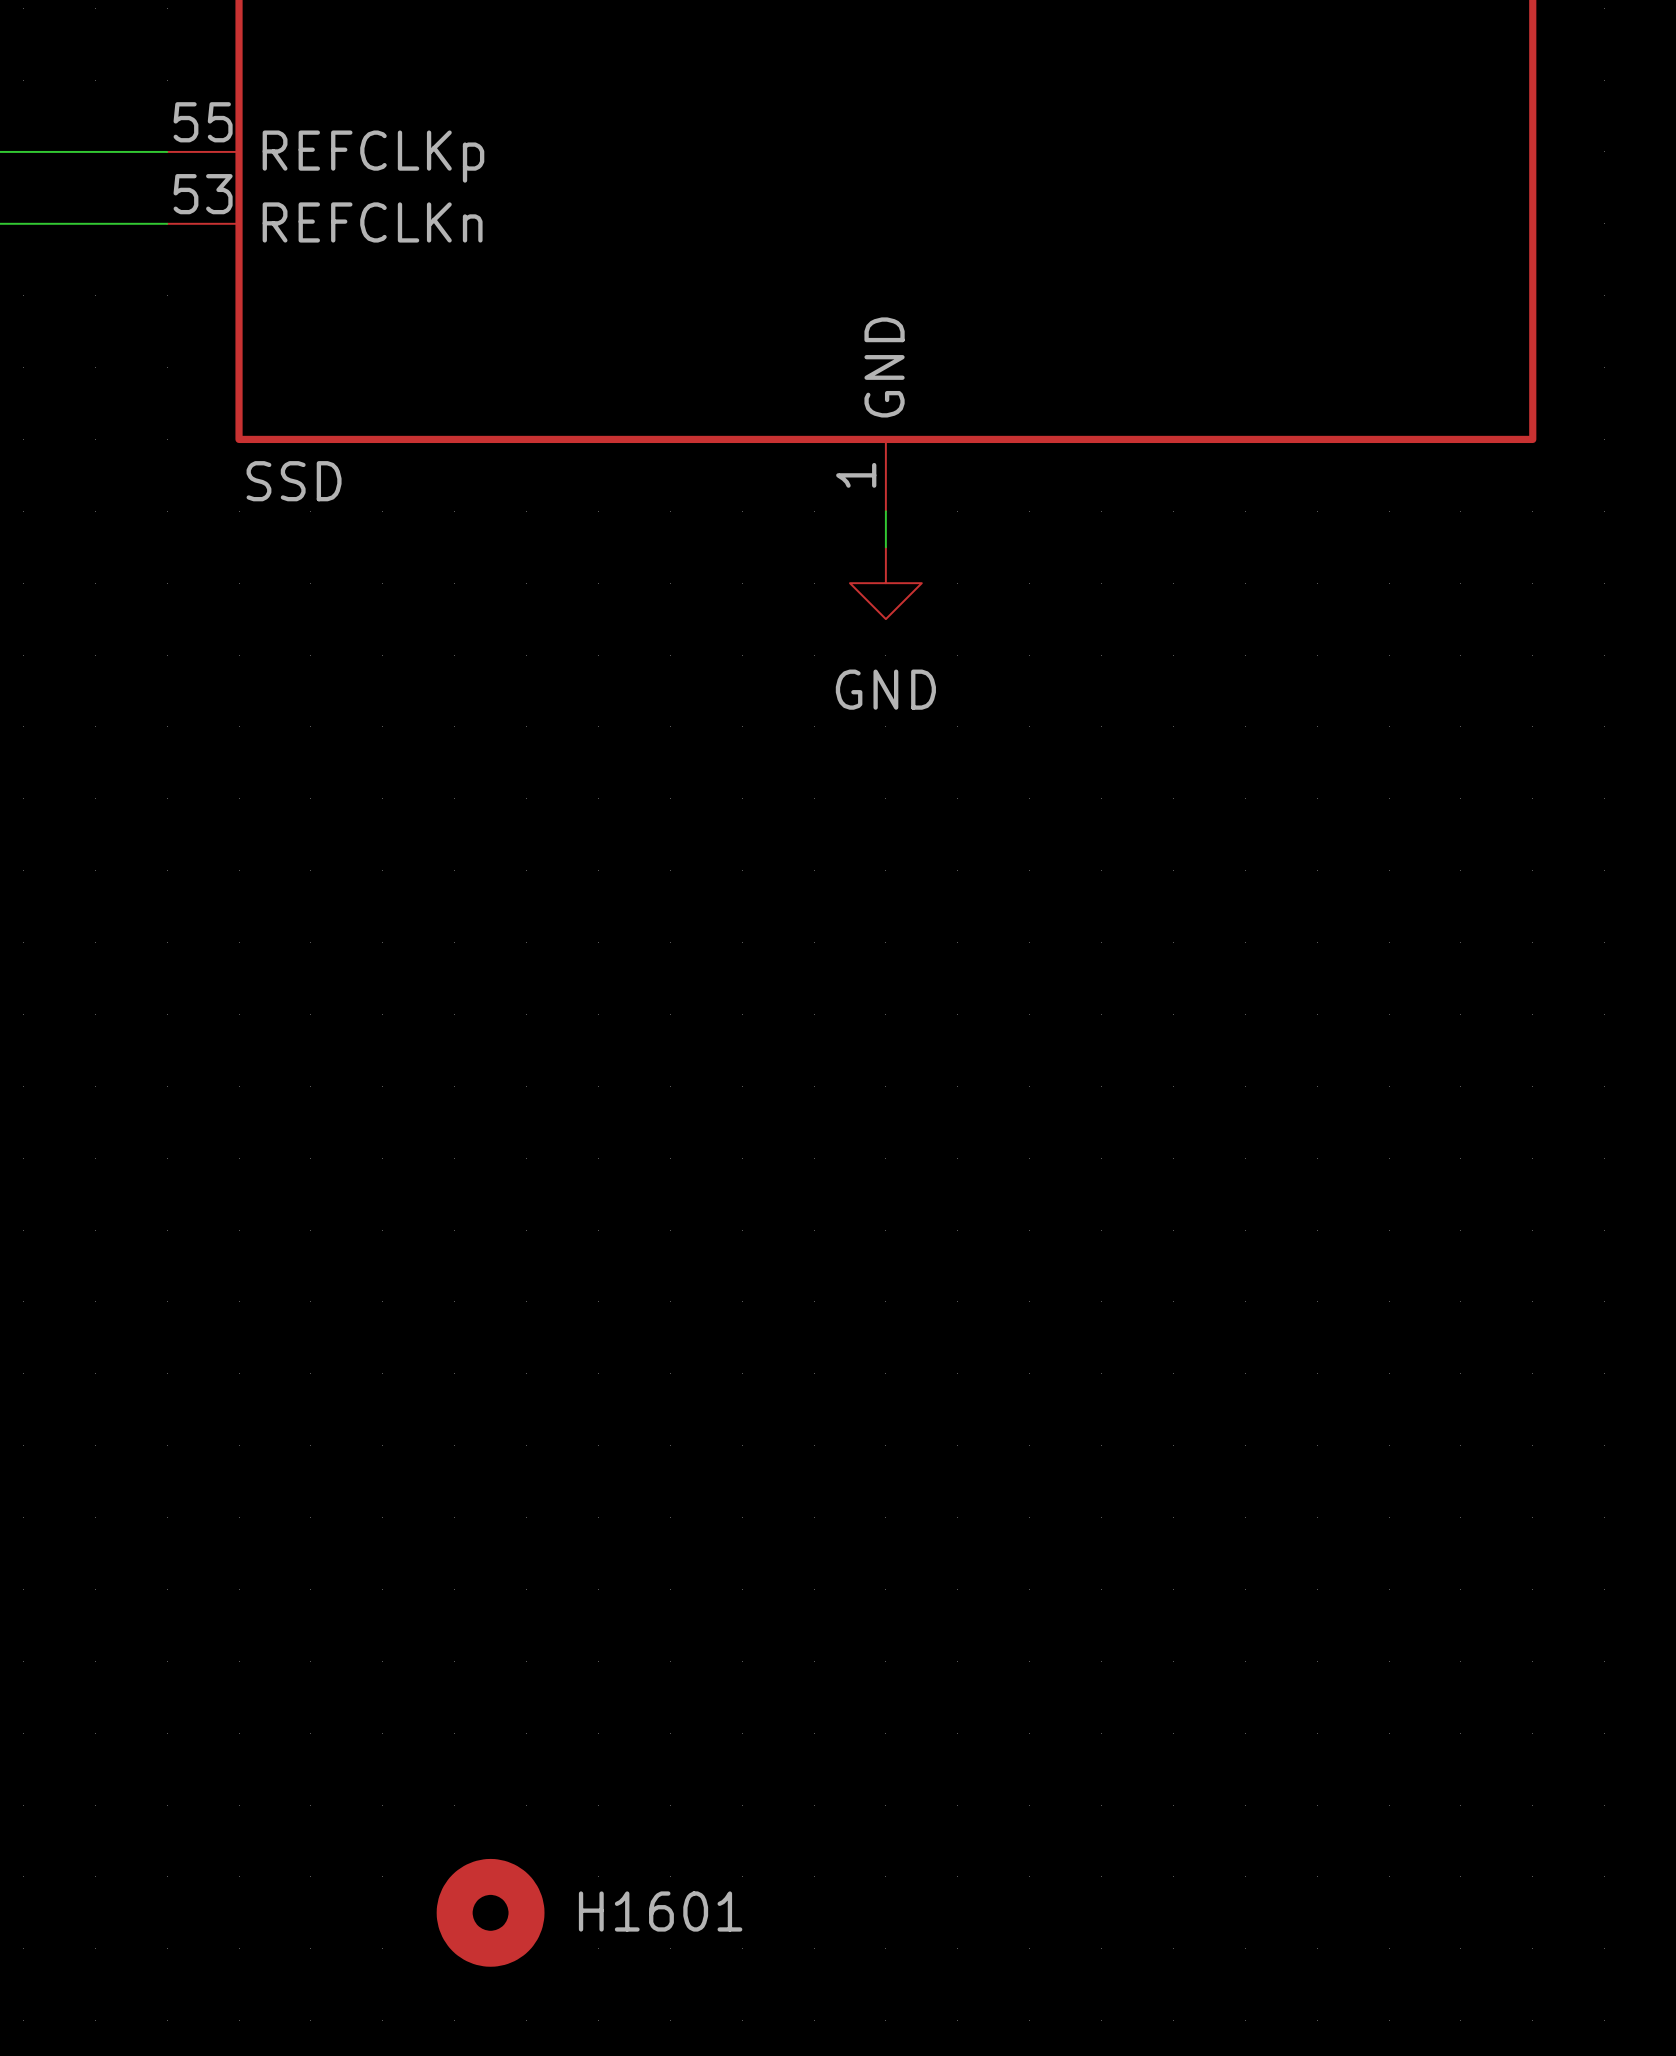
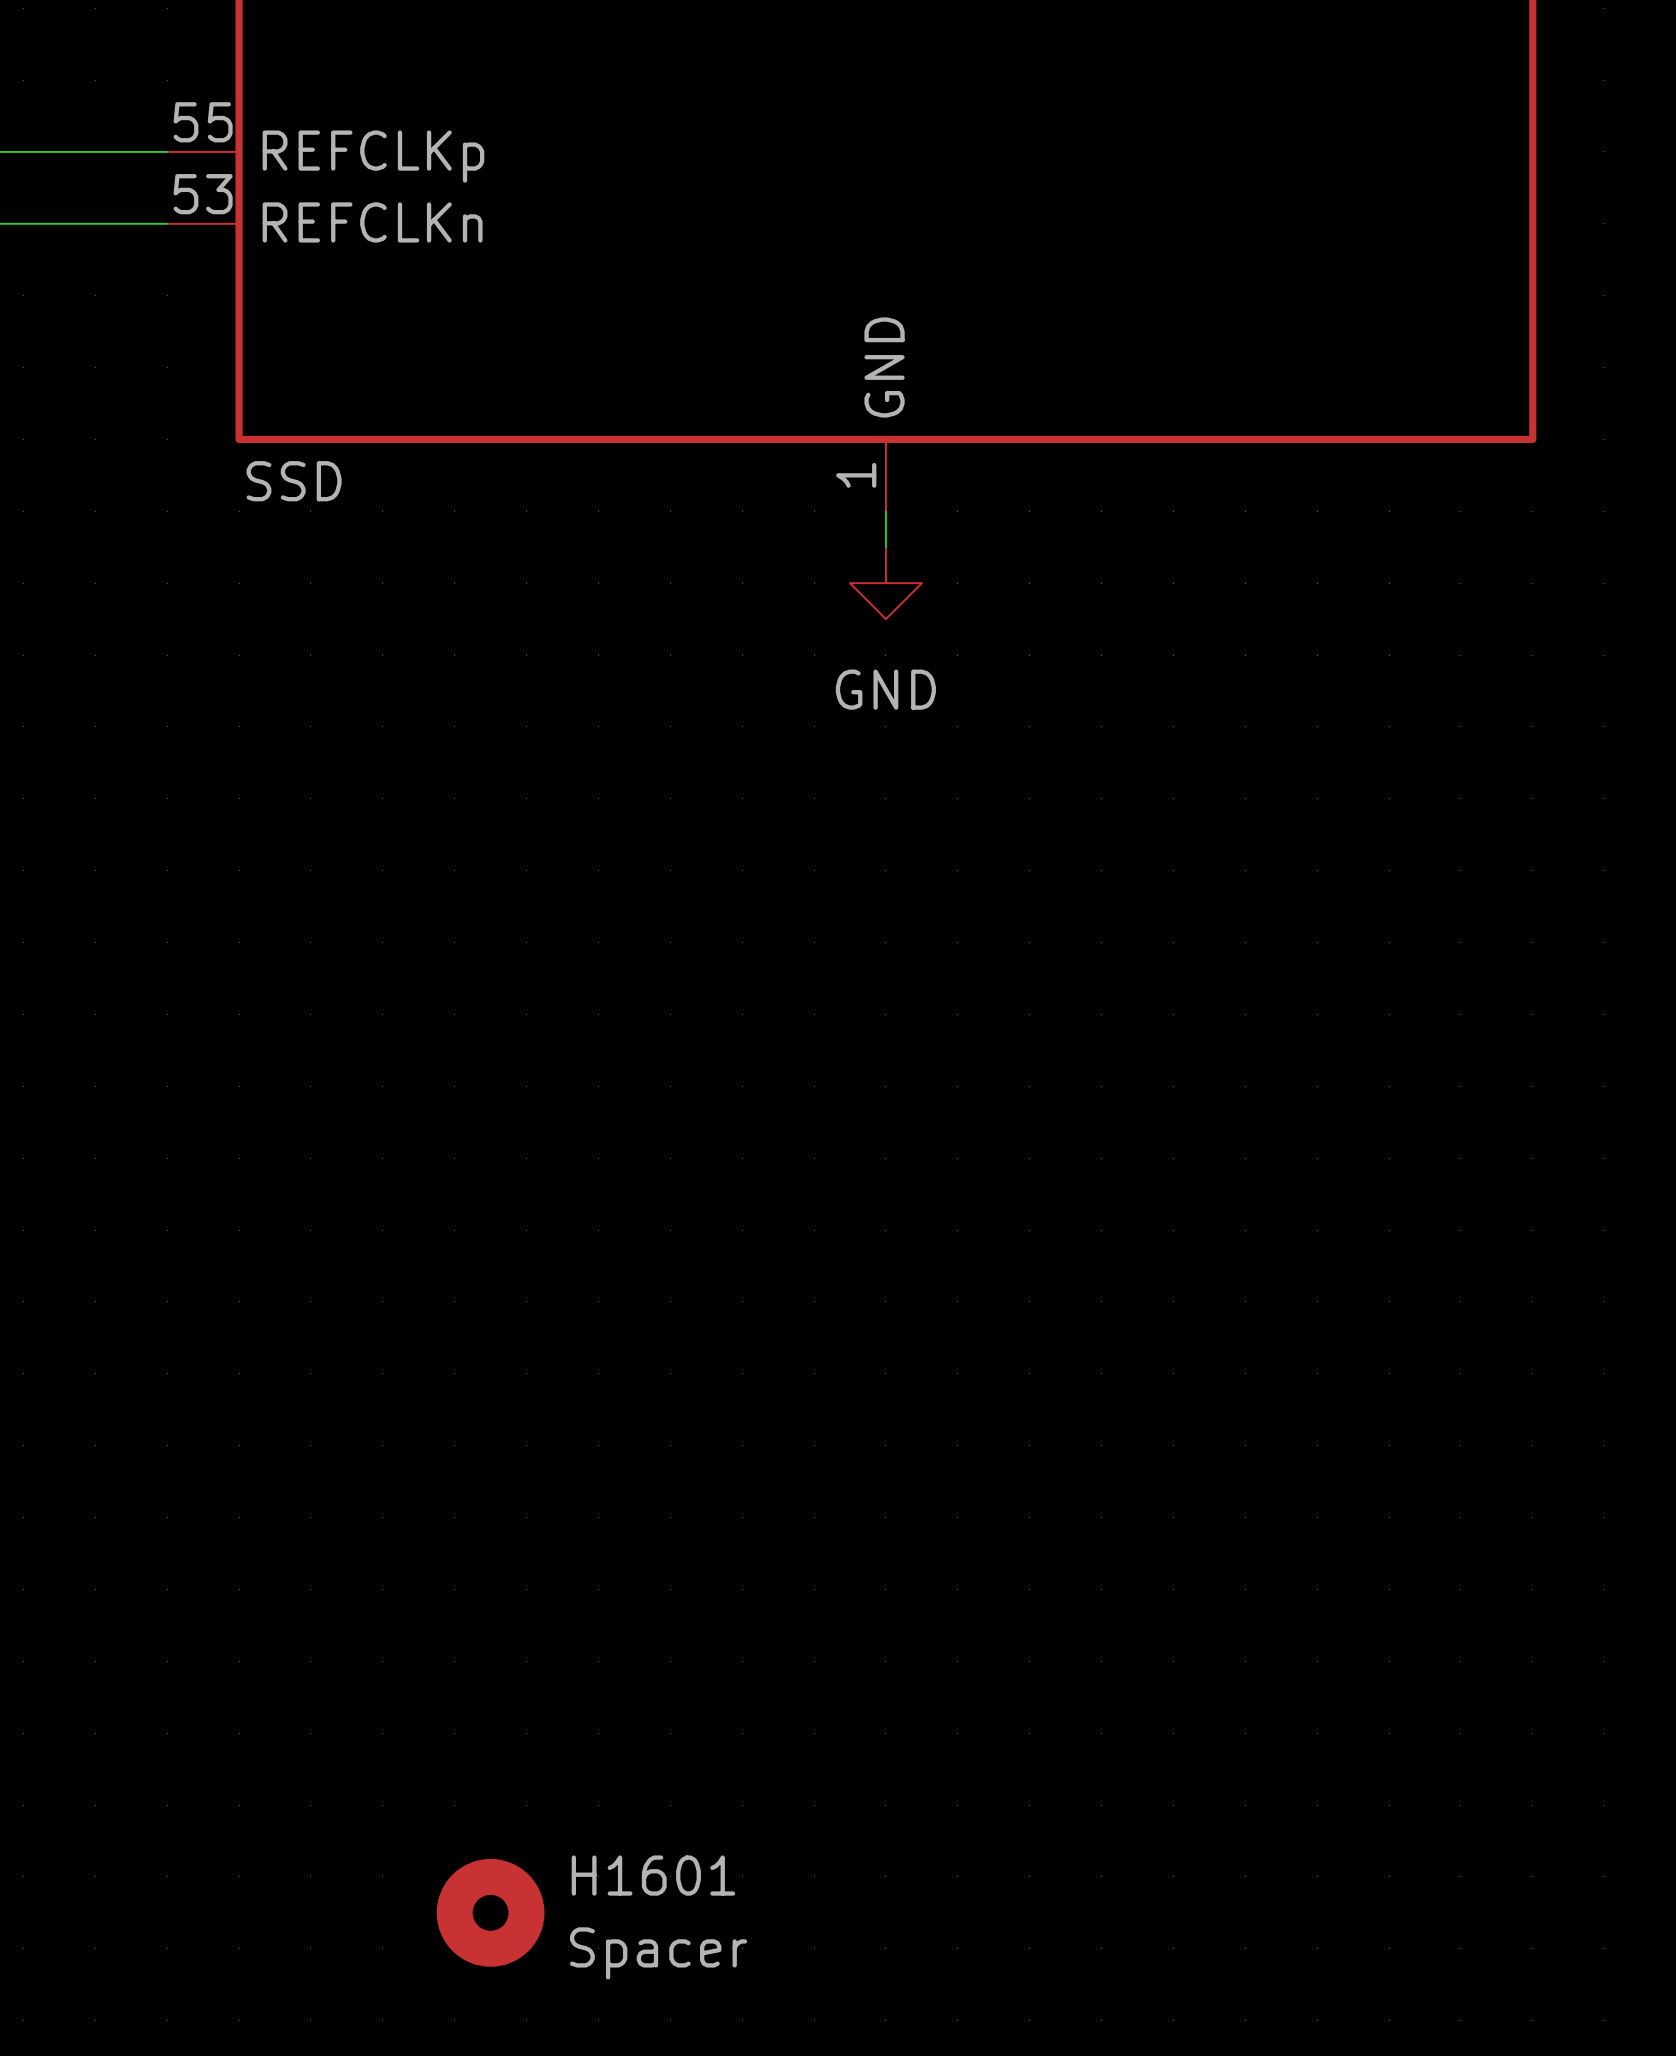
H1601 name position: H1601 (660, 1911) -> H1601 (653, 1875)
H1601 value: none -> Spacer (658, 1953)

